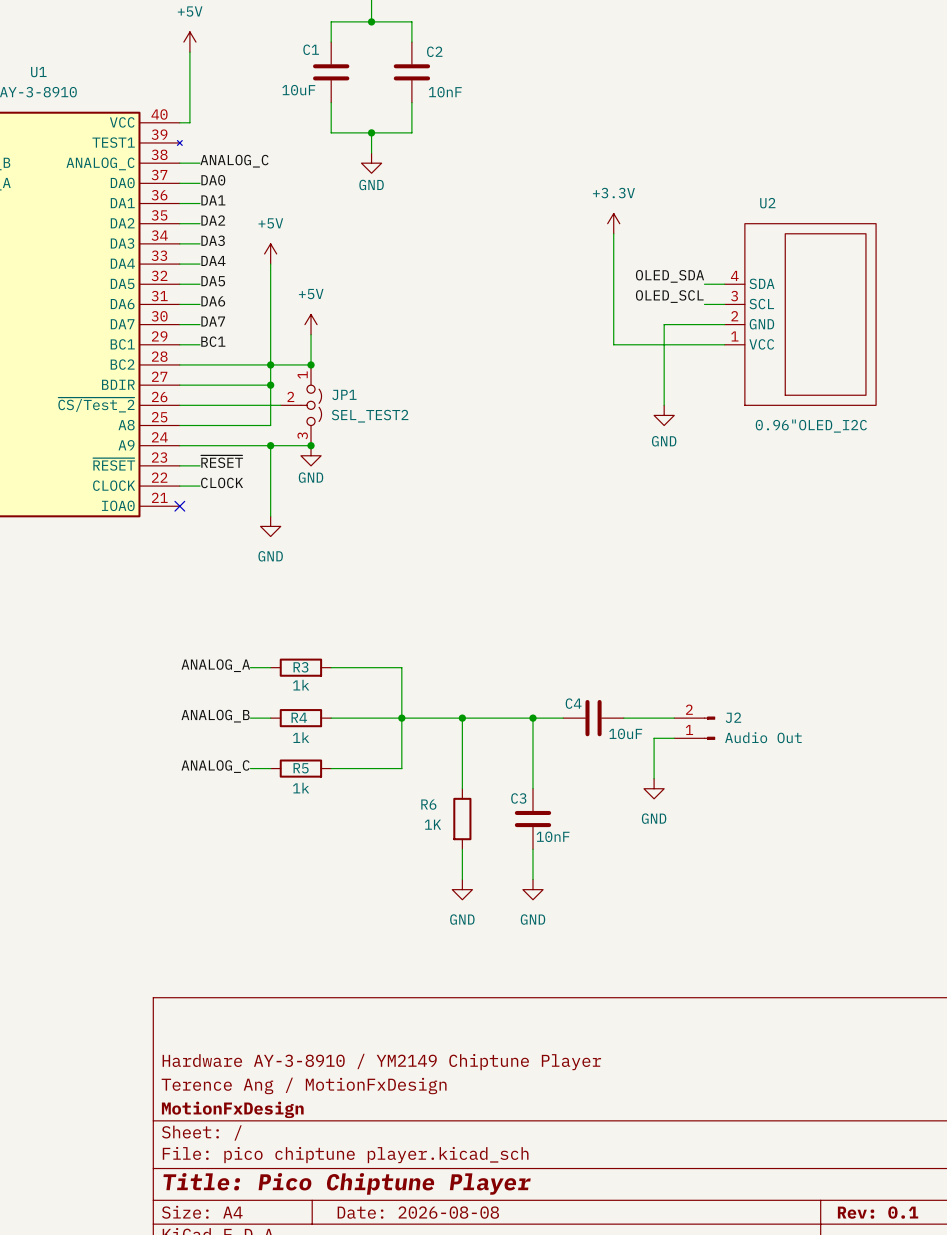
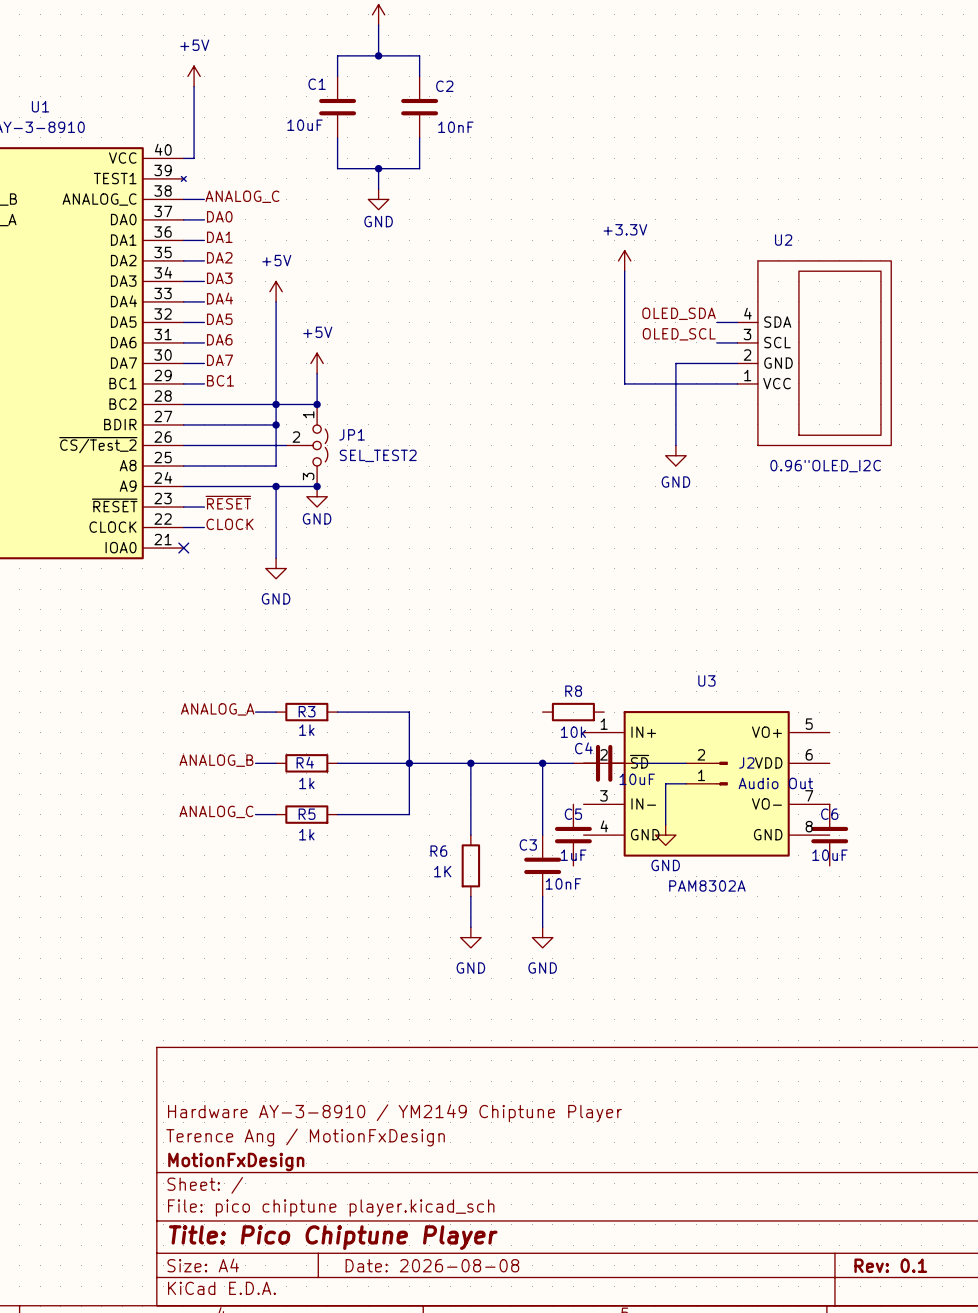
R8: none -> 10k (573, 712)
U3: none -> PAM8302A (706, 783)
C5: none -> 1uF (573, 835)
C6: none -> 10uF (829, 835)

